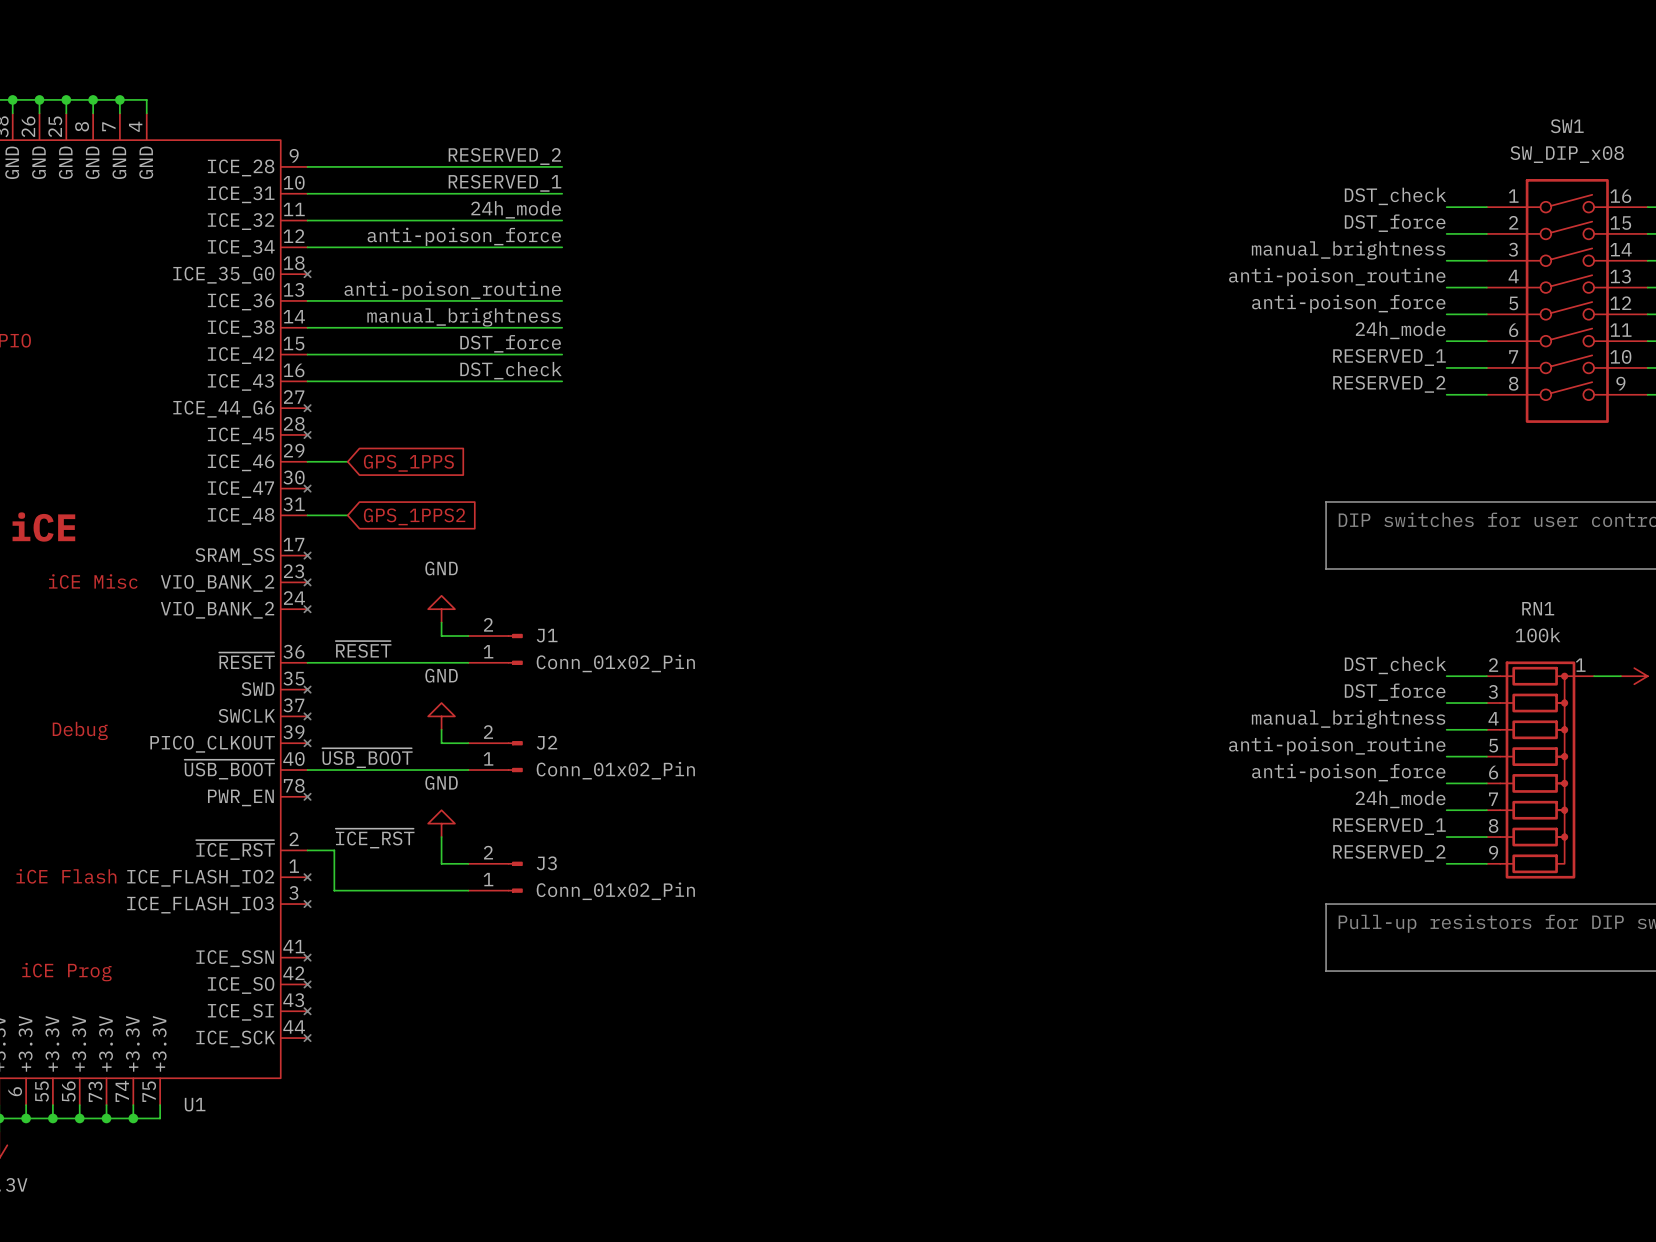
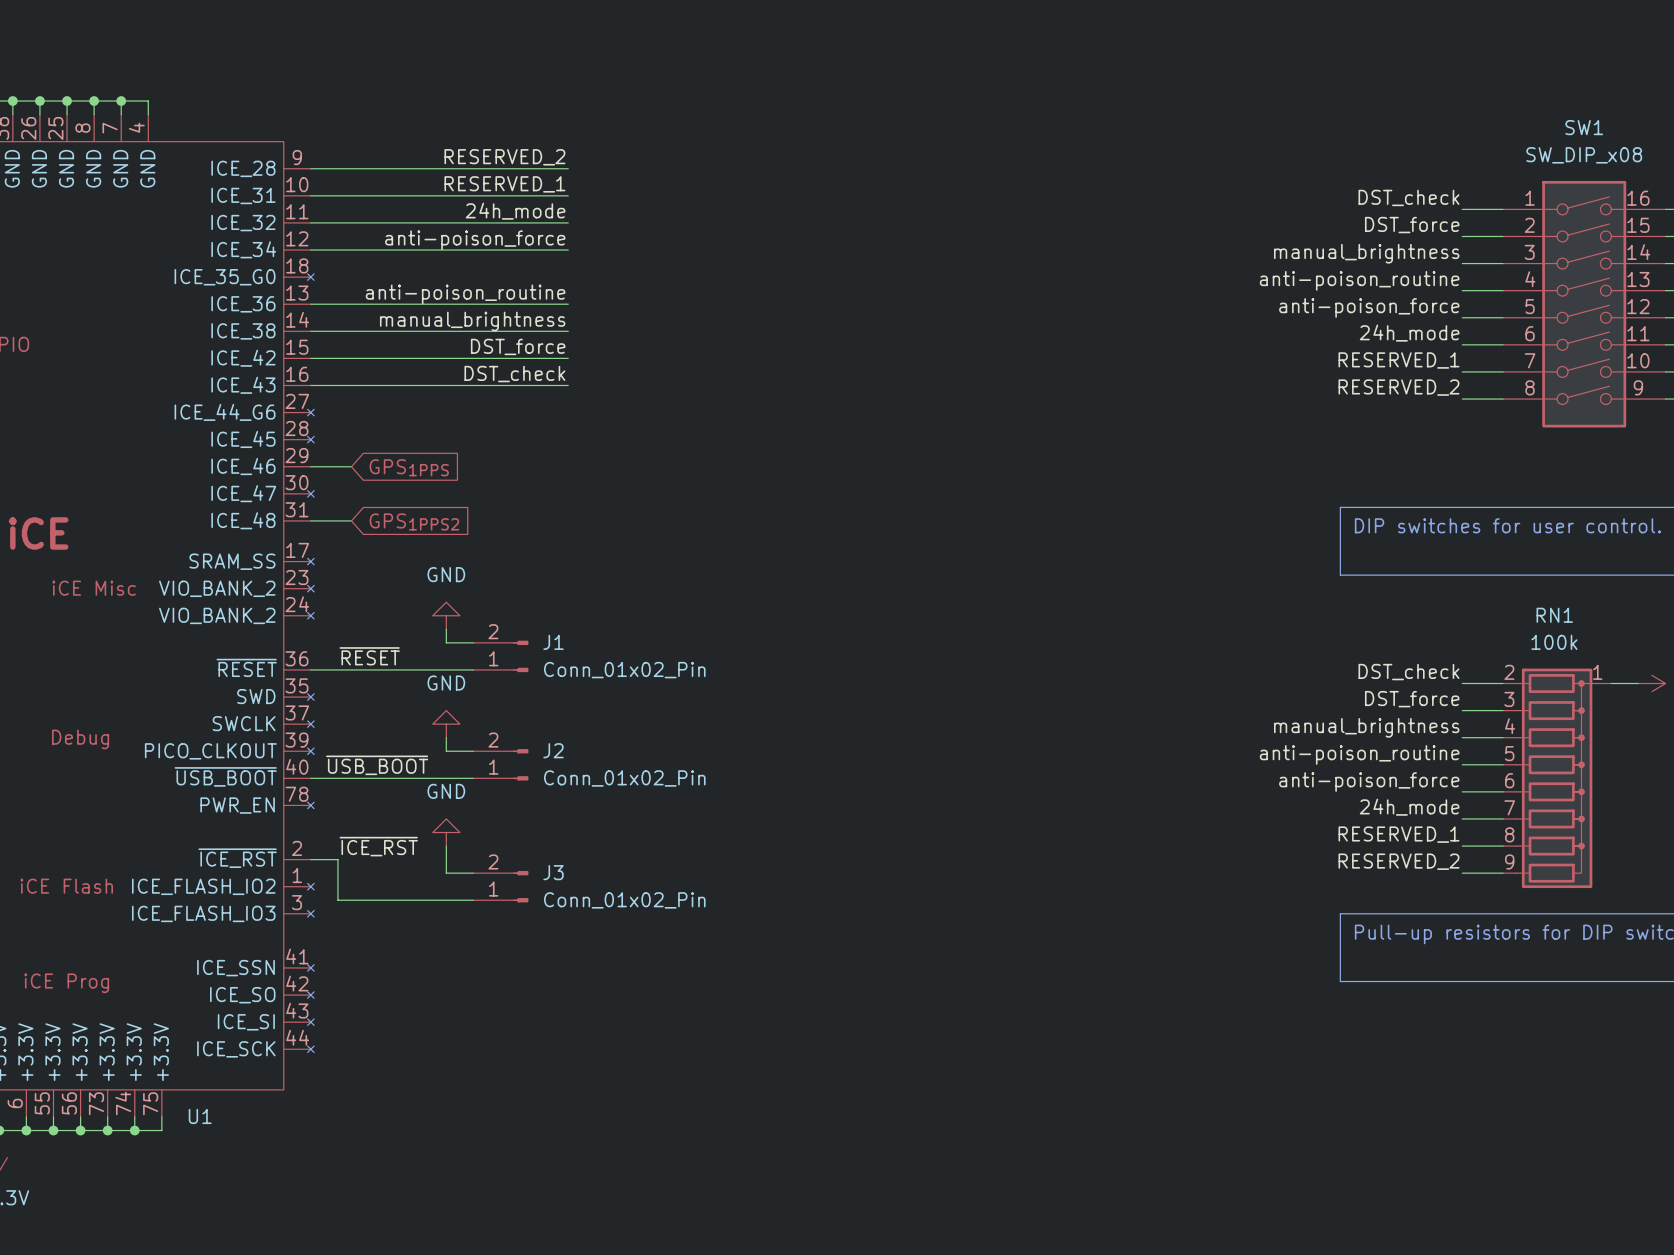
global label: GPS_1PPS (408, 463) -> GPS1PPS (409, 467)
global label: GPS_1PPS2 (414, 516) -> GPS1PPS2 (414, 521)

